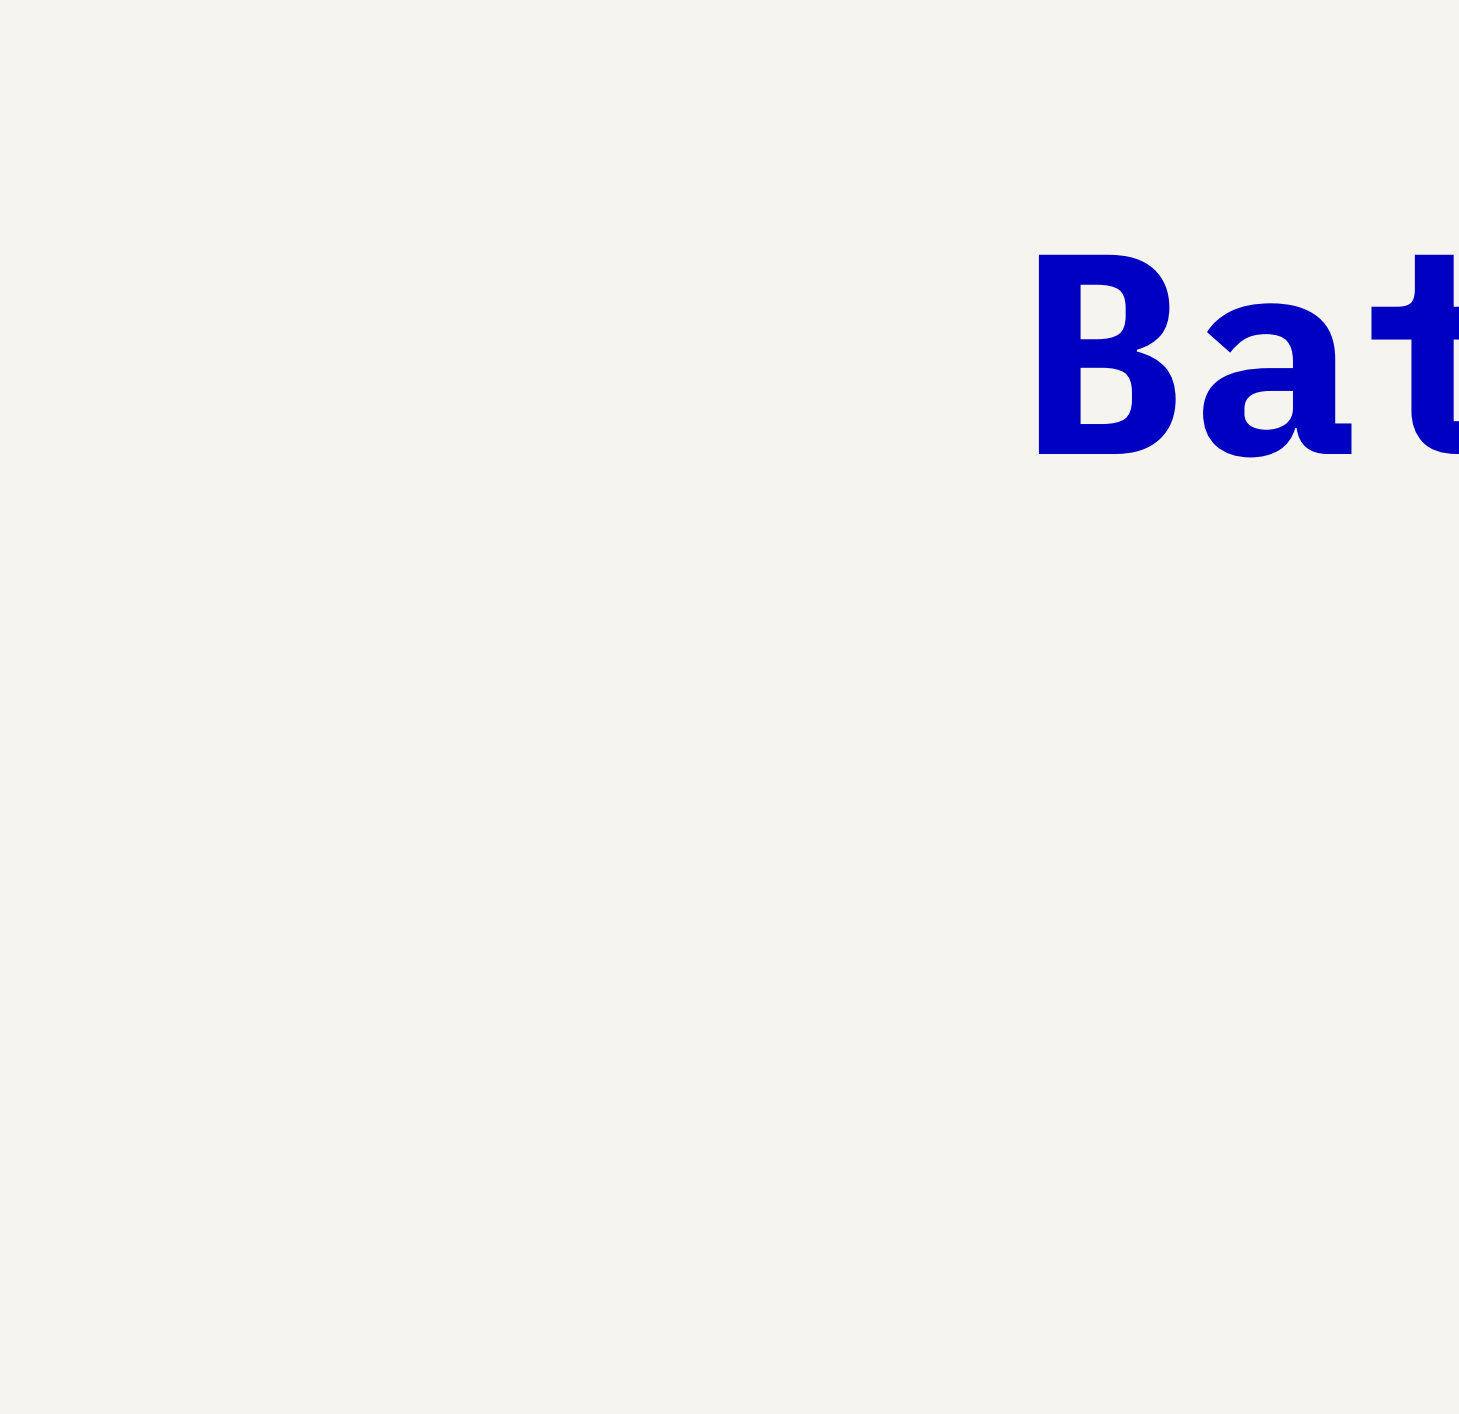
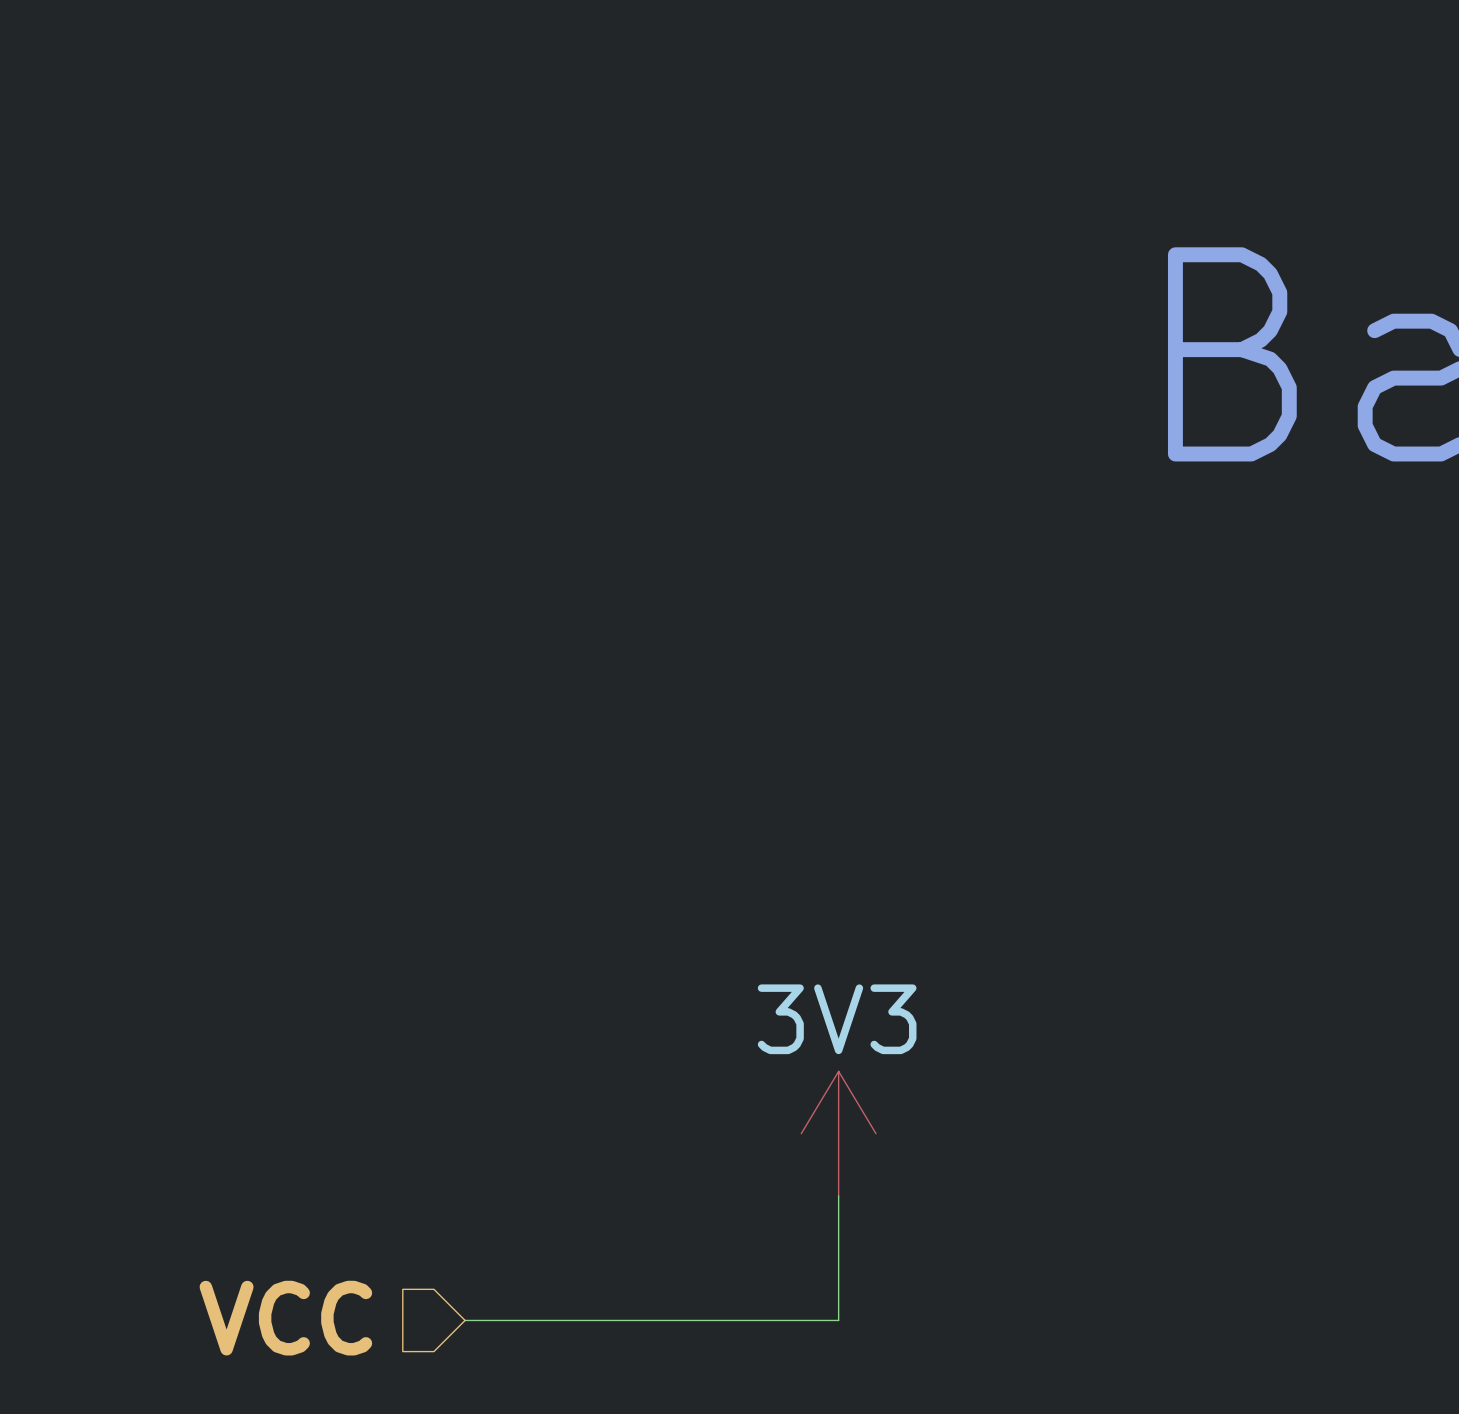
power symbol: none -> 3V3 (838, 1133)
wire: none -> (838, 1195) (838, 1320) (465, 1320)
hierarchical label: none -> VCC (285, 1318)

